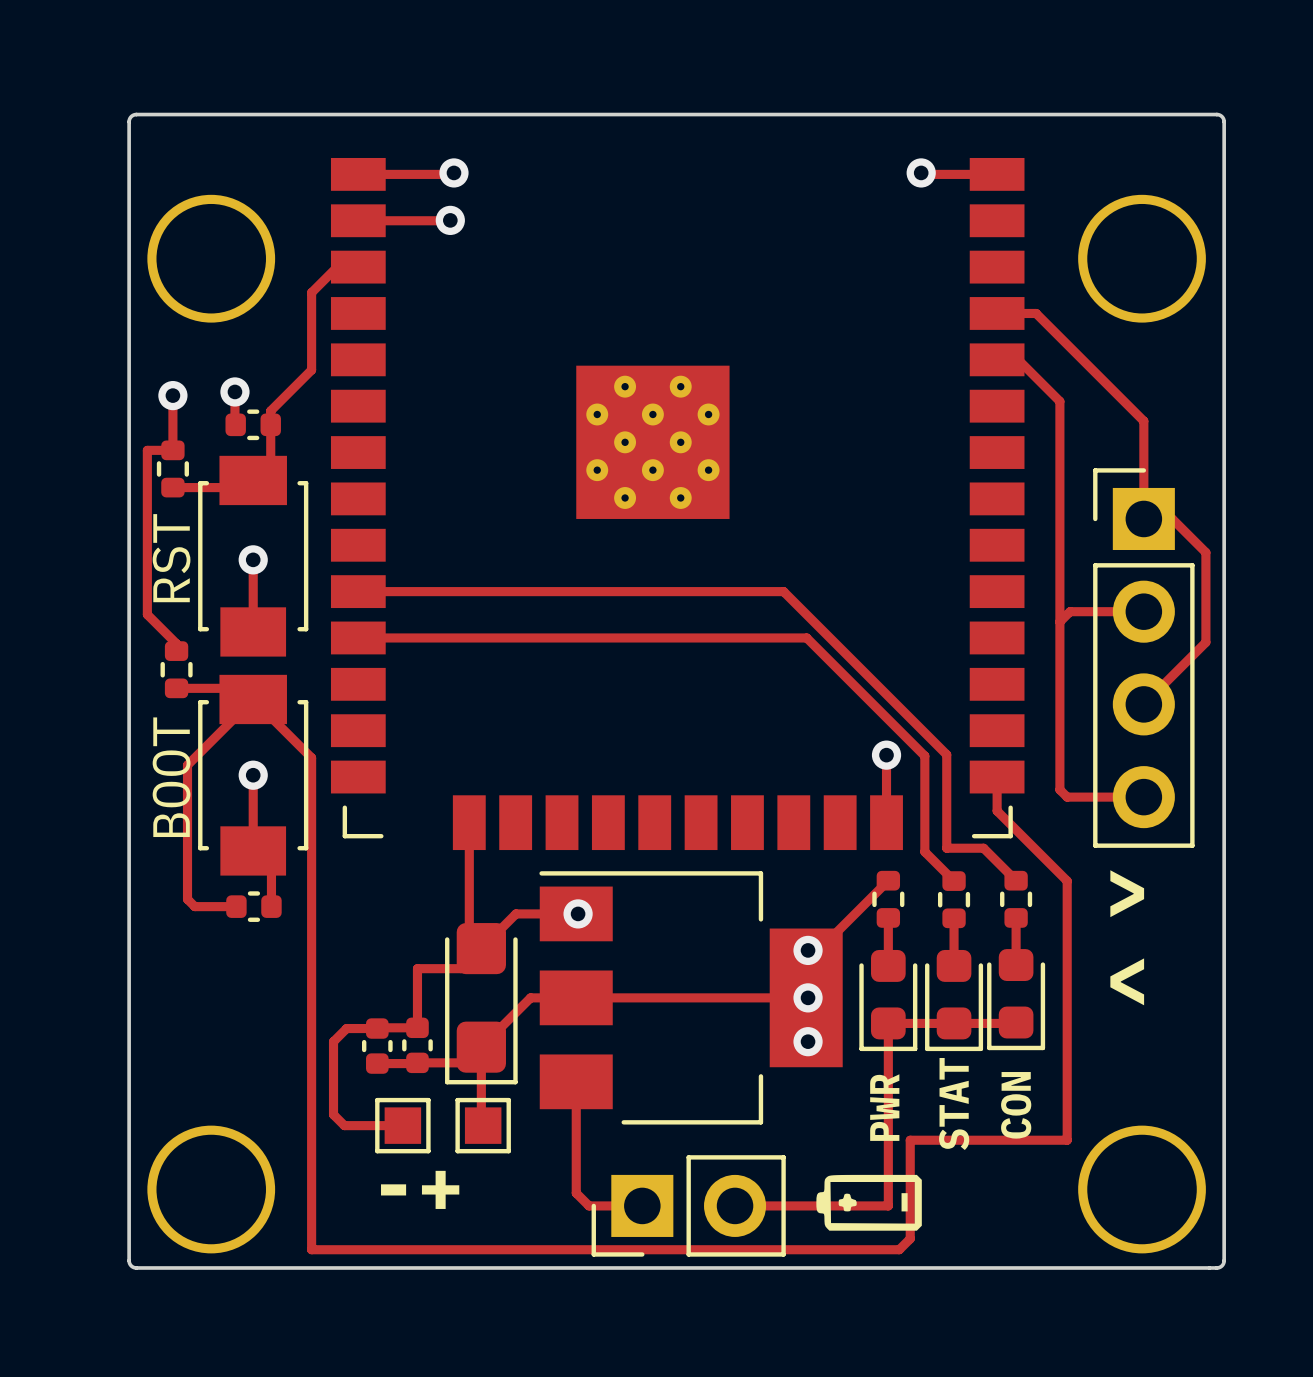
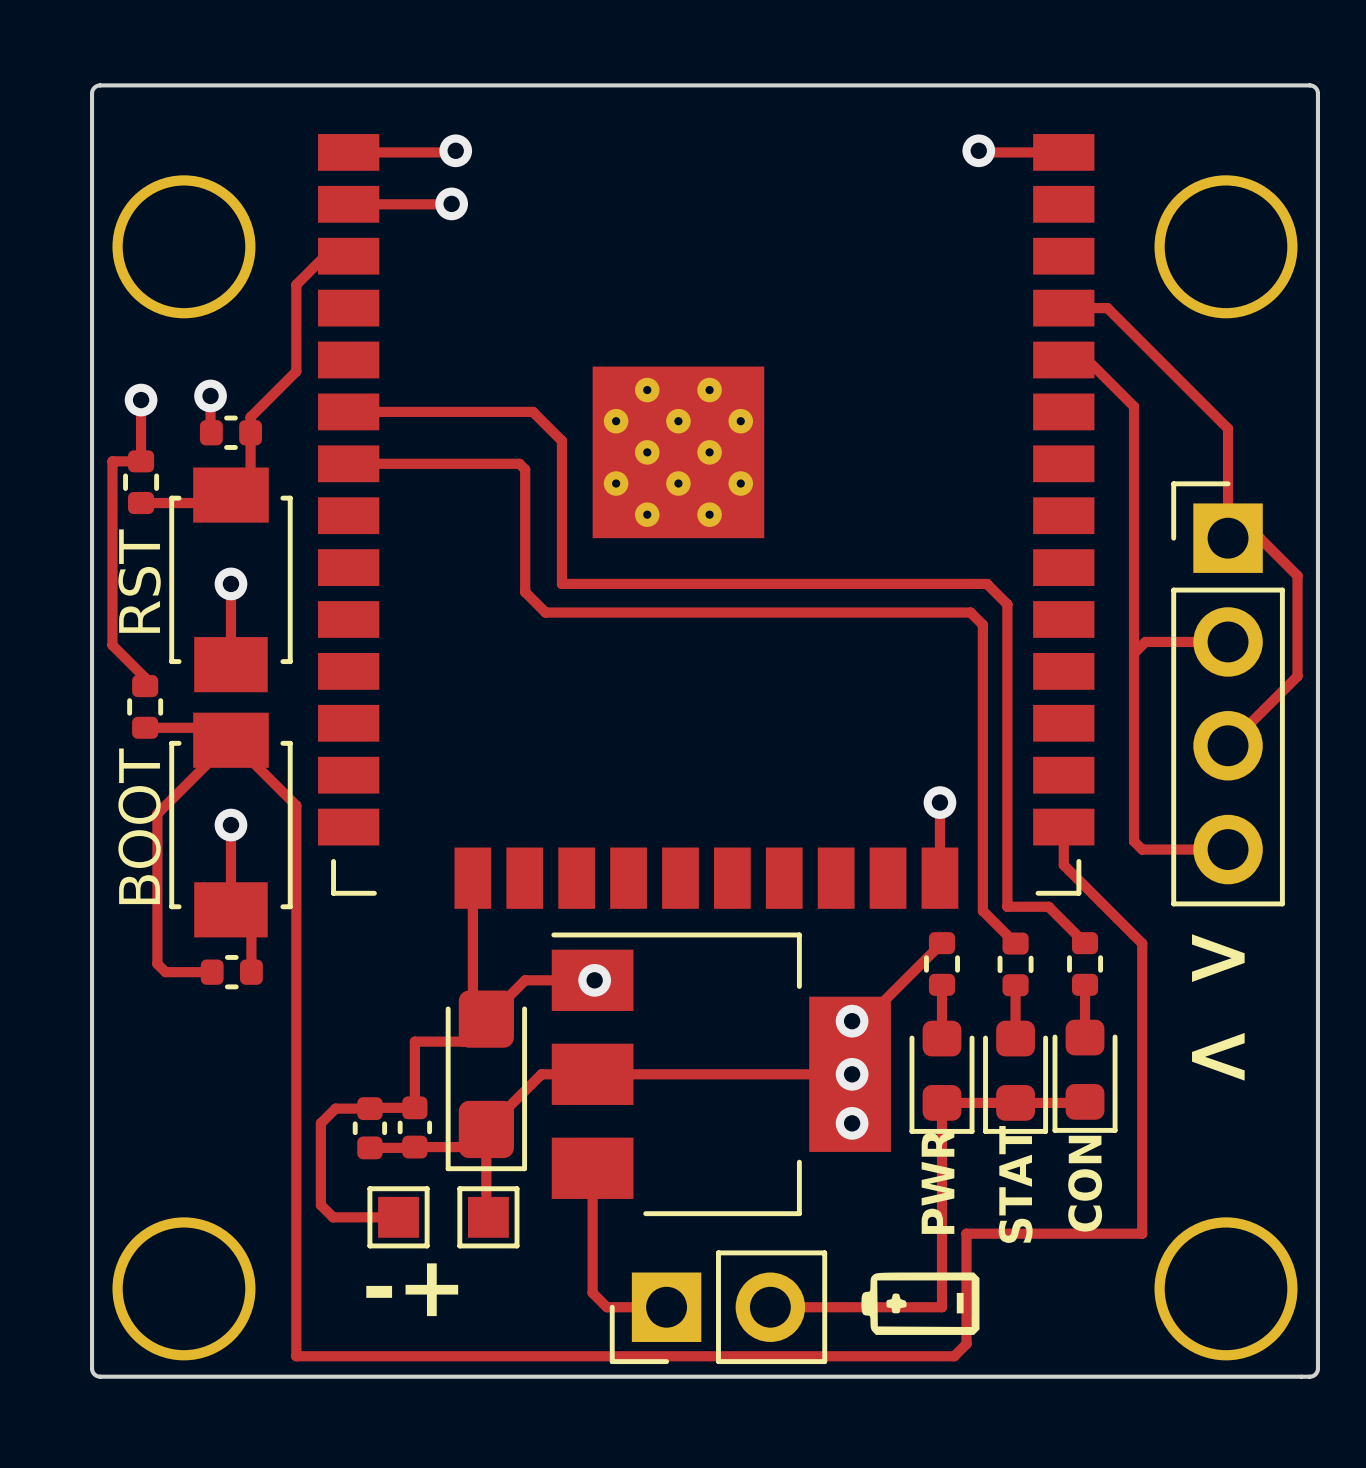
track: (358, 591) (783, 591) (946, 754) -> (348, 411) (532, 411) (561, 440) (561, 583) (986, 583) (1007, 604) (1007, 802)
track: (358, 637) (806, 637) (924, 756) -> (348, 463) (519, 463) (525, 469) (525, 592) (545, 612) (970, 612) (982, 624) (982, 803)

